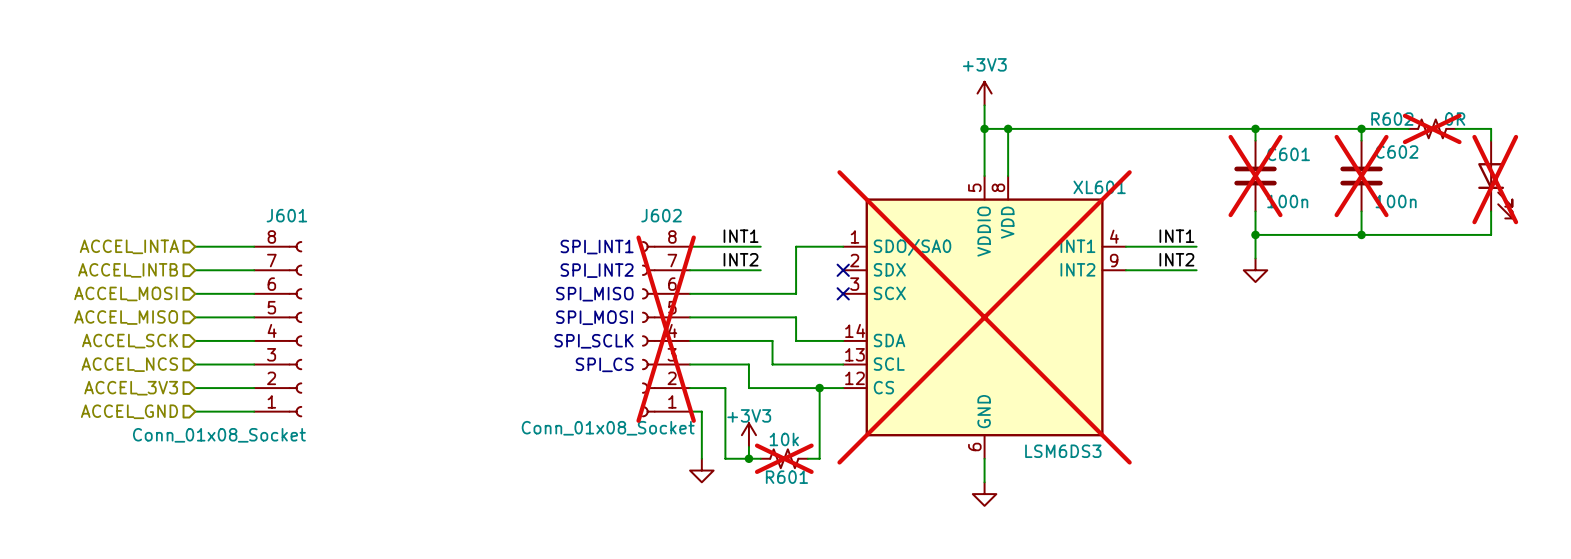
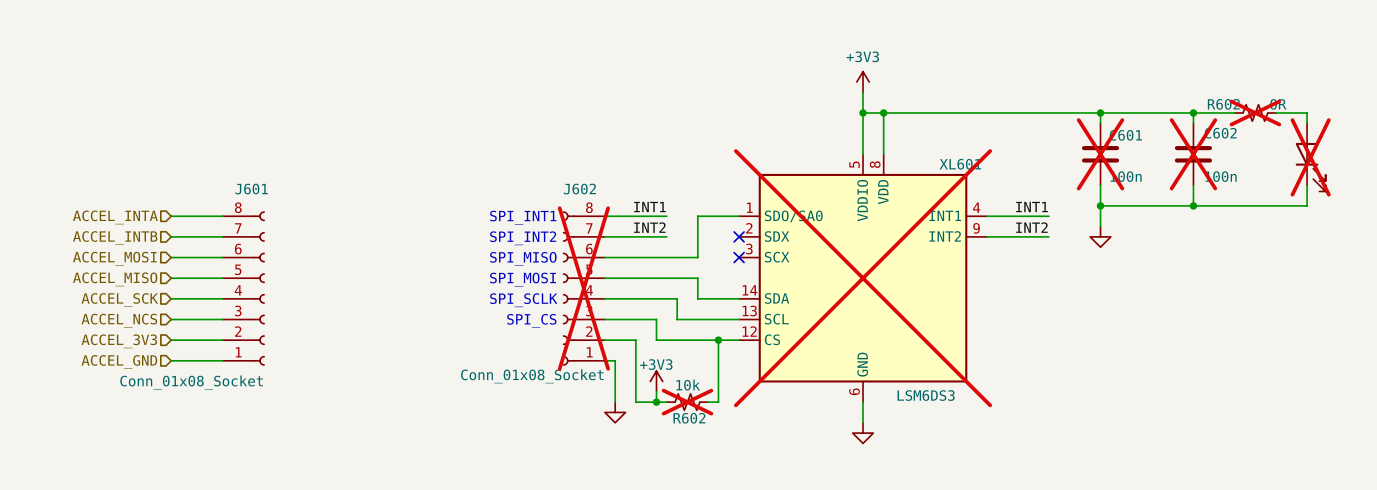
R601 name: R601 (786, 477) -> R602 (689, 418)

